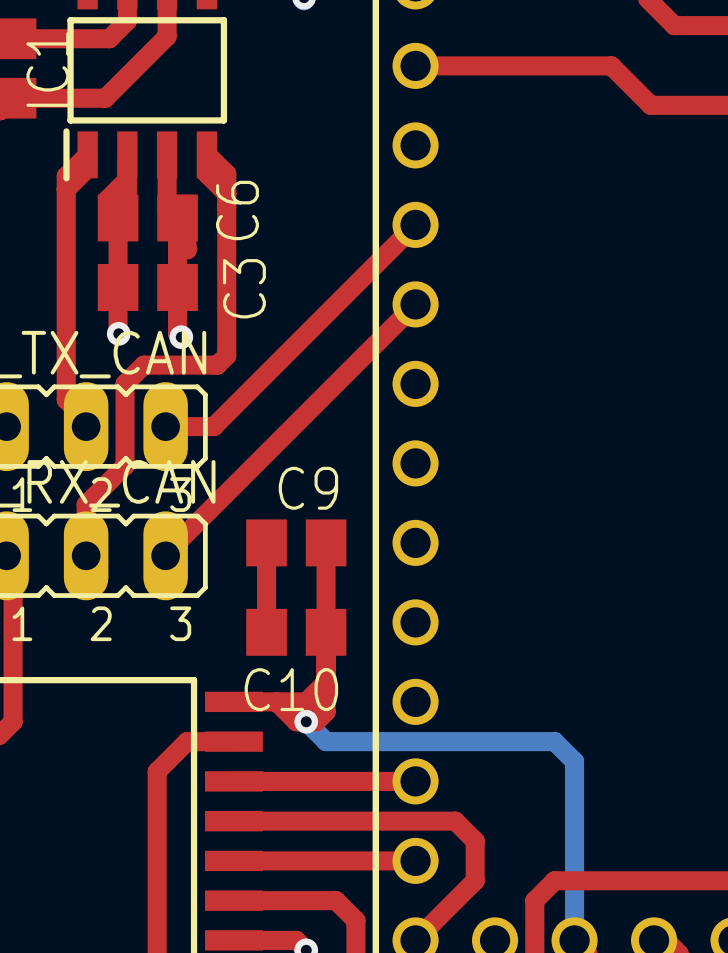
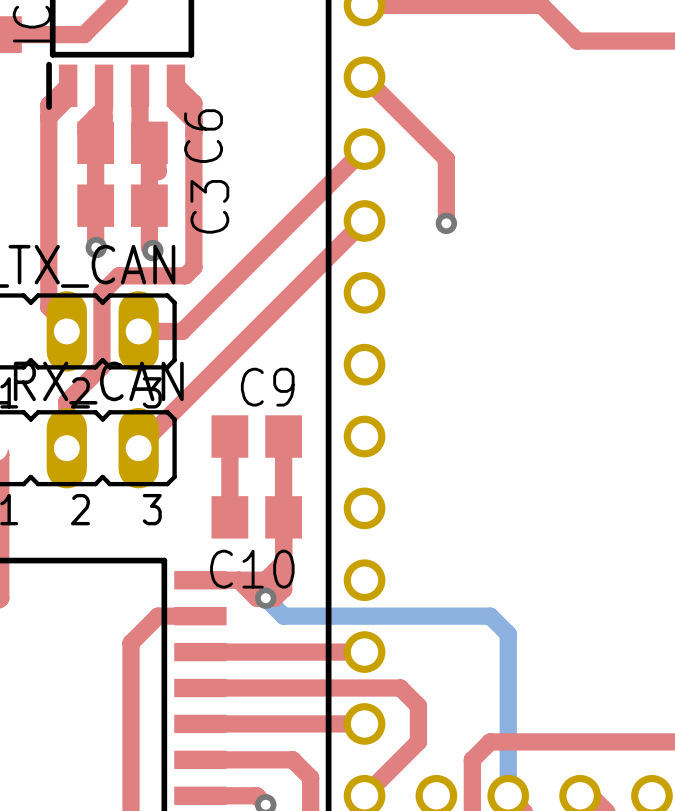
top track: none -> (364, 77) (446, 159) (446, 223)
via: none -> (446, 223)

